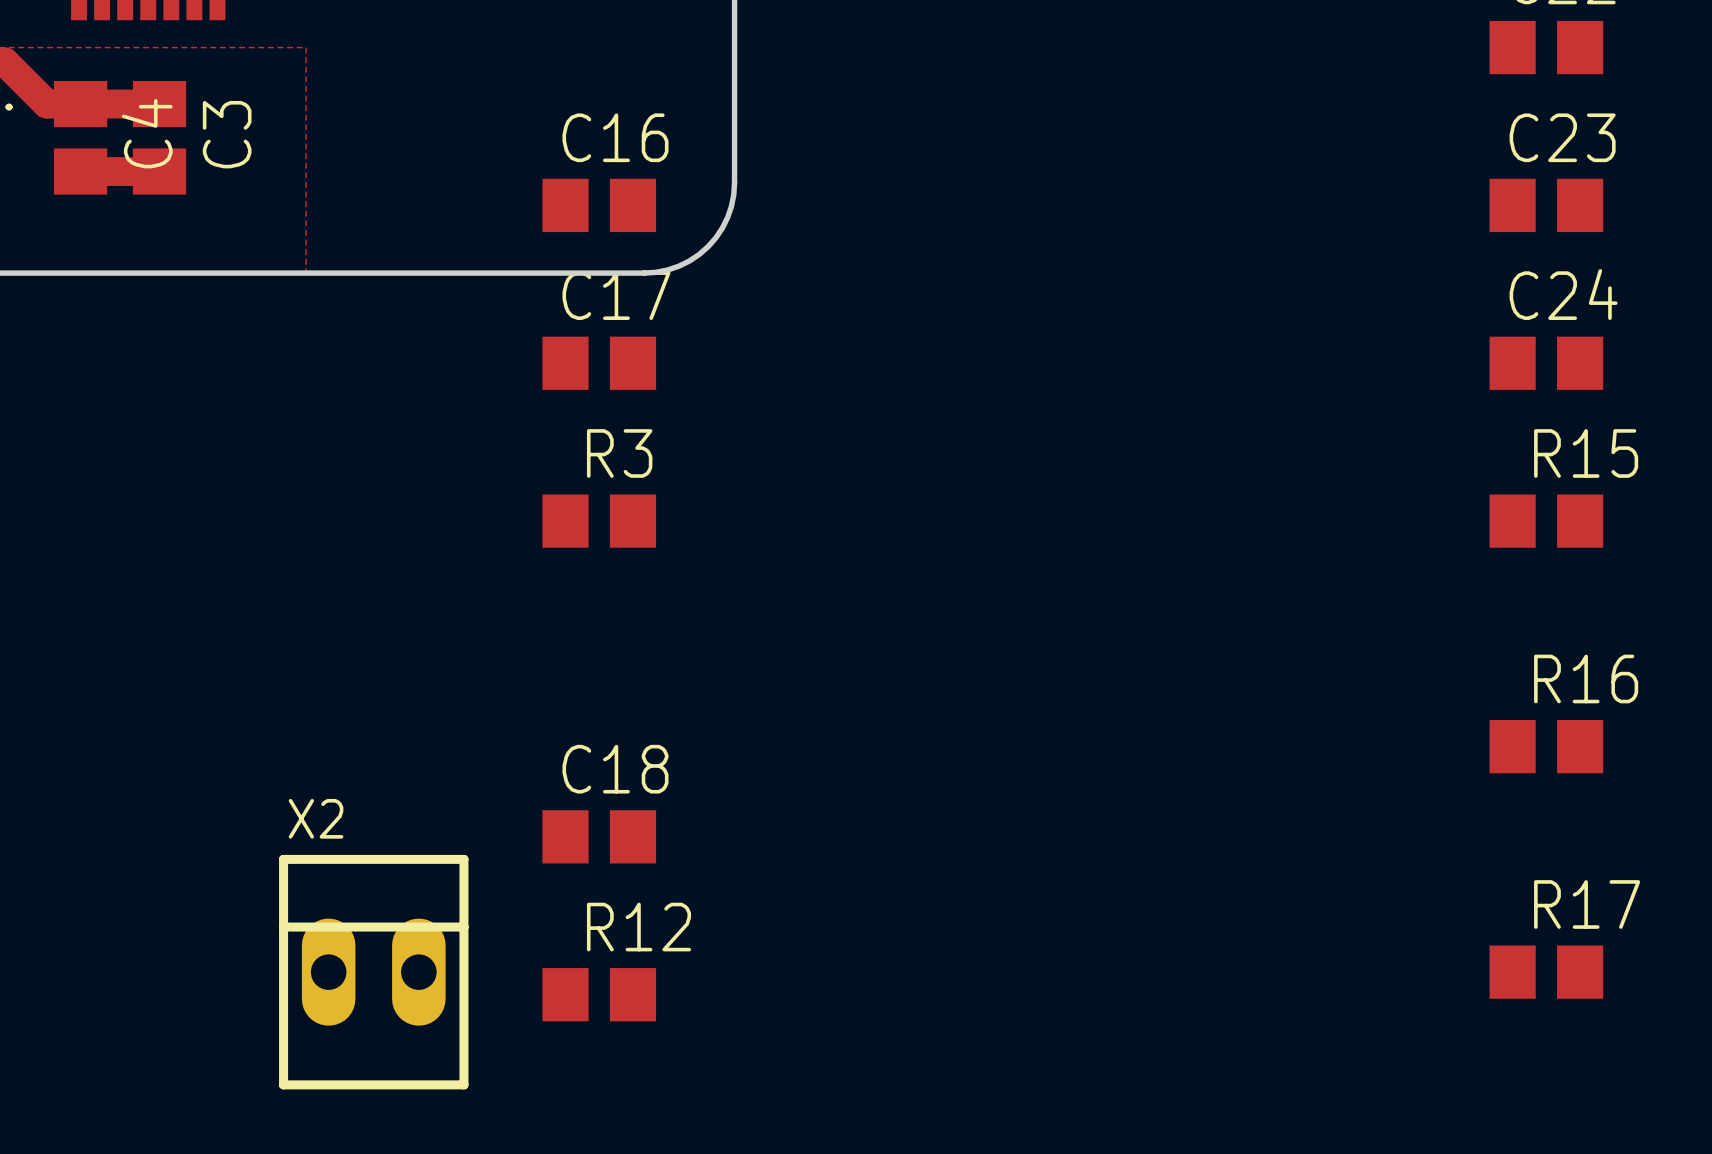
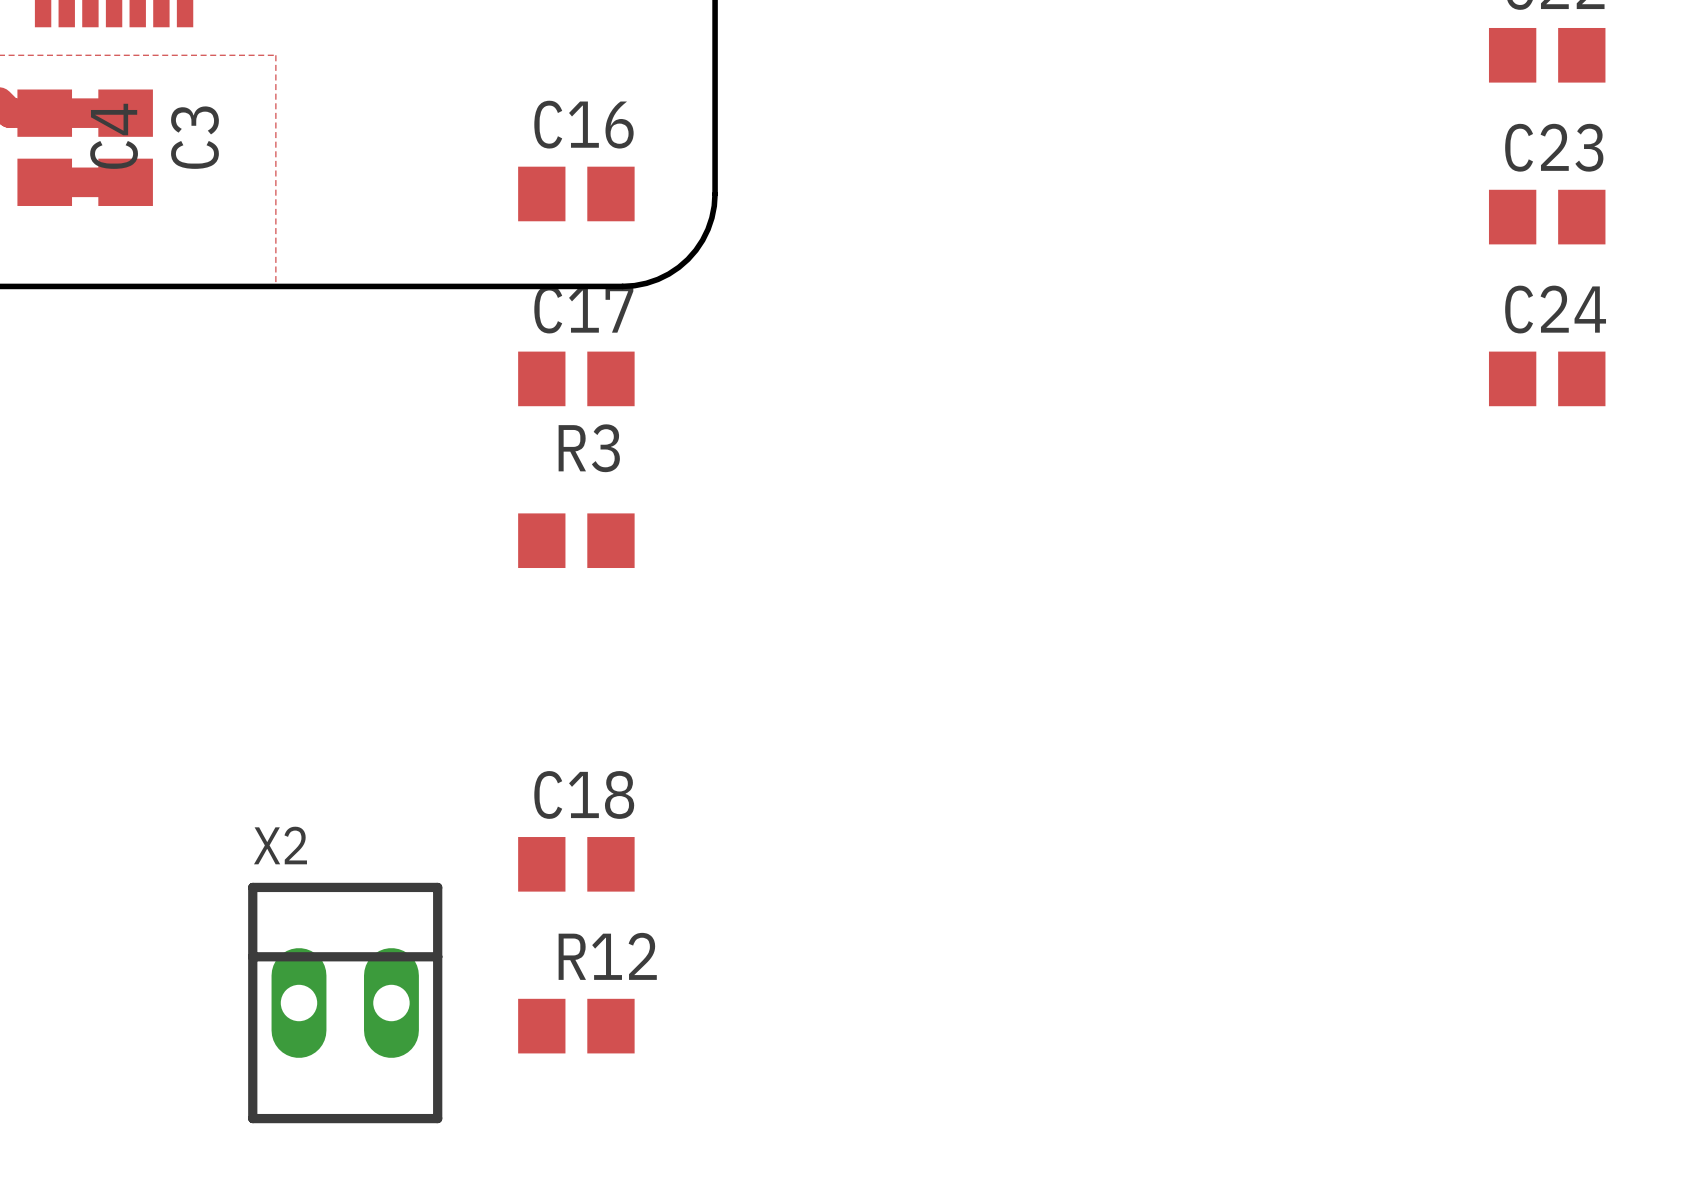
C16 position: (599, 205) -> (576, 193)
R3 name position: R3 (619, 453) -> R3 (589, 448)
R15: (1546, 521) -> none
R16: (1546, 746) -> none
R17: (1546, 972) -> none

